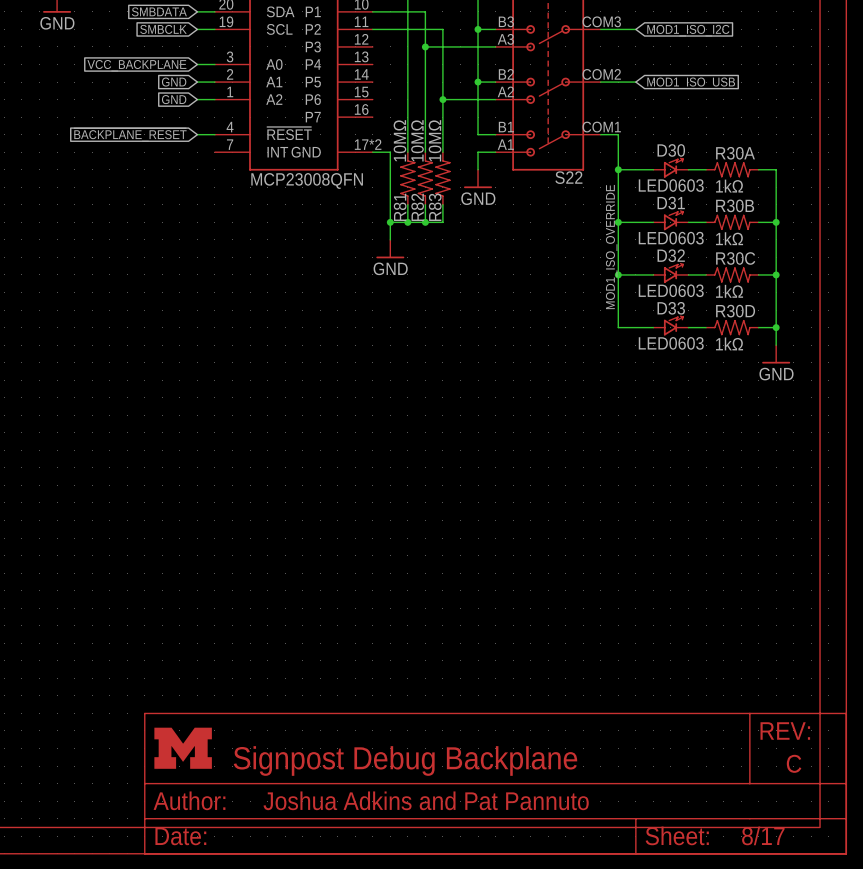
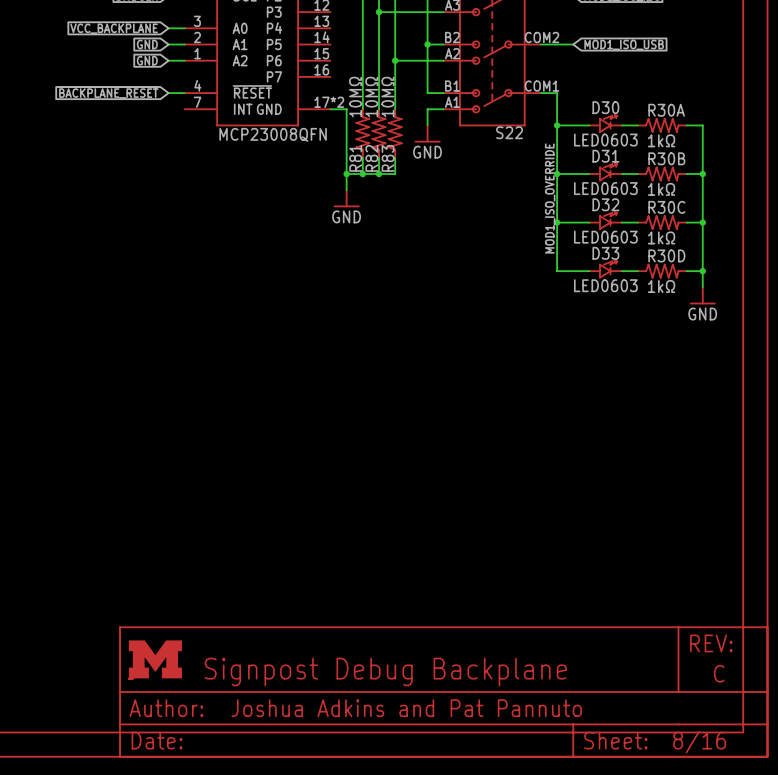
part text: 8/17 (763, 835) -> 8/16 (699, 742)

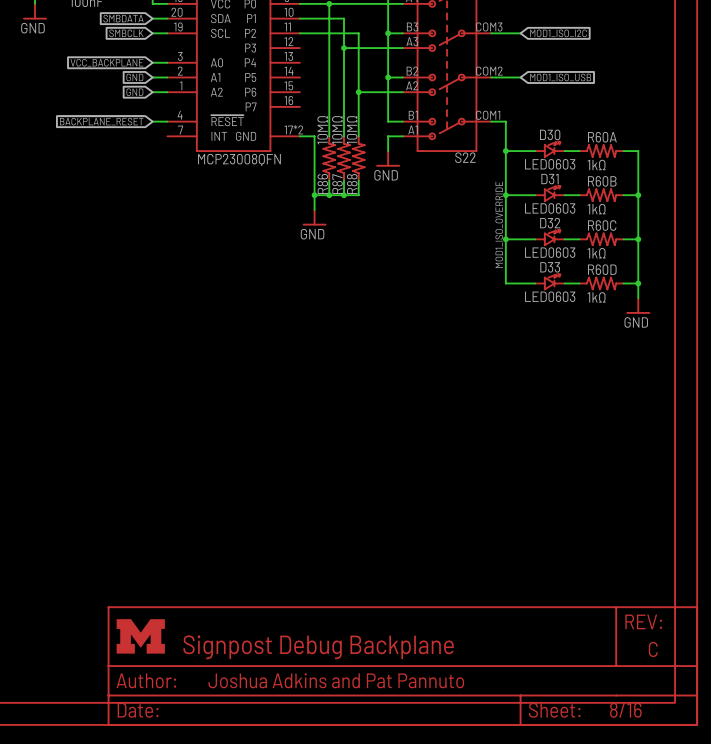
R30A name: R30A (666, 110) -> R60A (602, 137)
R81 name: R81 (355, 158) -> R86 (322, 184)
R82 name: R82 (371, 158) -> R87 (337, 184)
R83 name: R83 (388, 158) -> R88 (352, 184)
R30B name: R30B (666, 158) -> R60B (602, 181)
R30C name: R30C (666, 207) -> R60C (602, 225)
R30D name: R30D (666, 255) -> R60D (602, 269)

